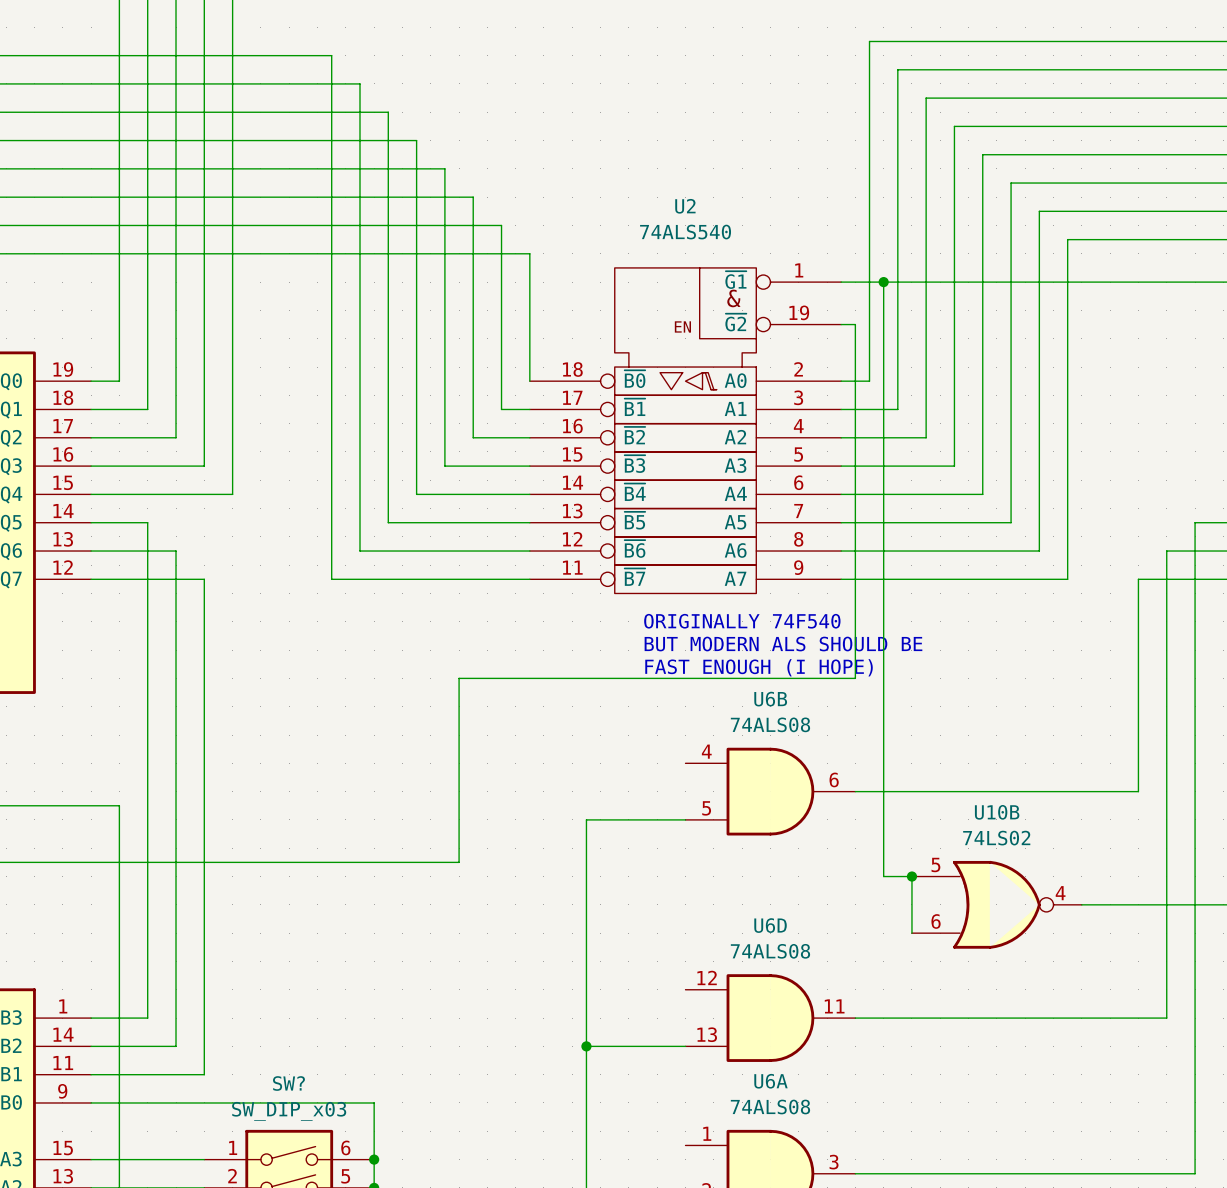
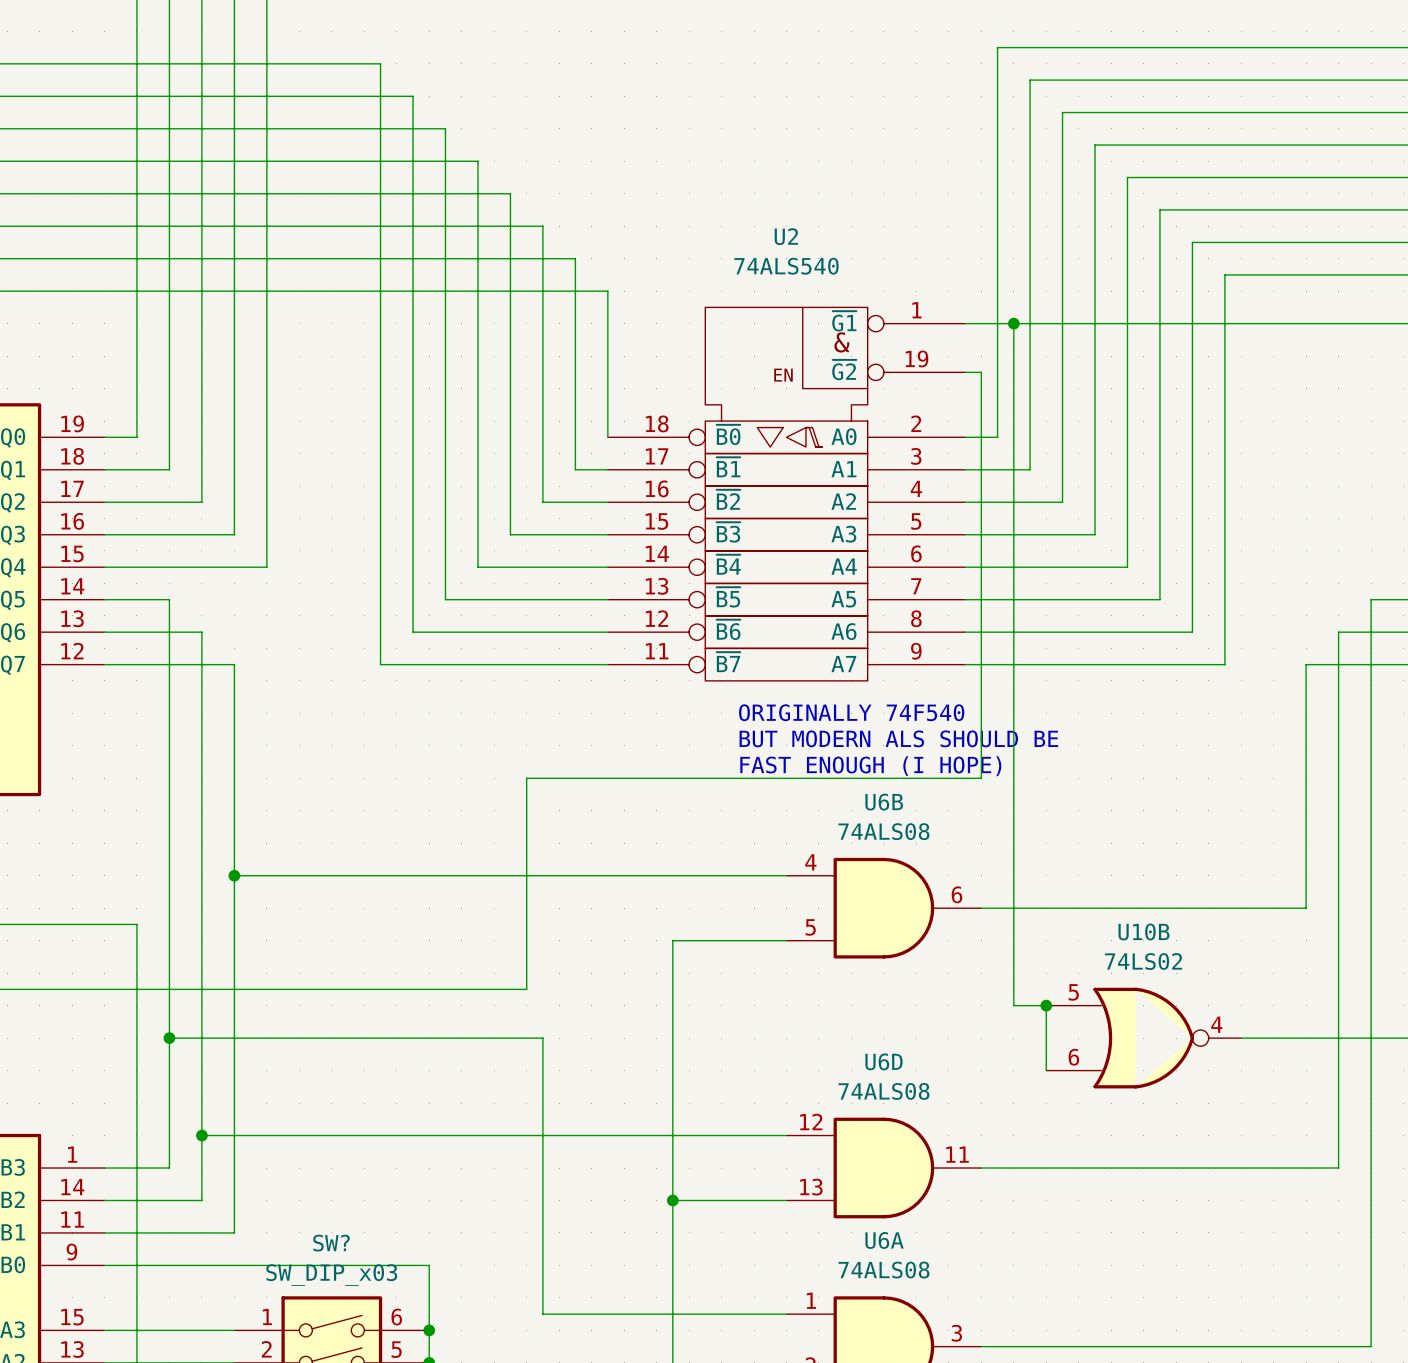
wire: none -> (234, 875) (786, 875)
junction: none -> (234, 875)
wire: none -> (169, 1038) (542, 1038) (542, 1314) (786, 1314)
junction: none -> (169, 1038)
wire: none -> (201, 1135) (786, 1135)
junction: none -> (201, 1135)

